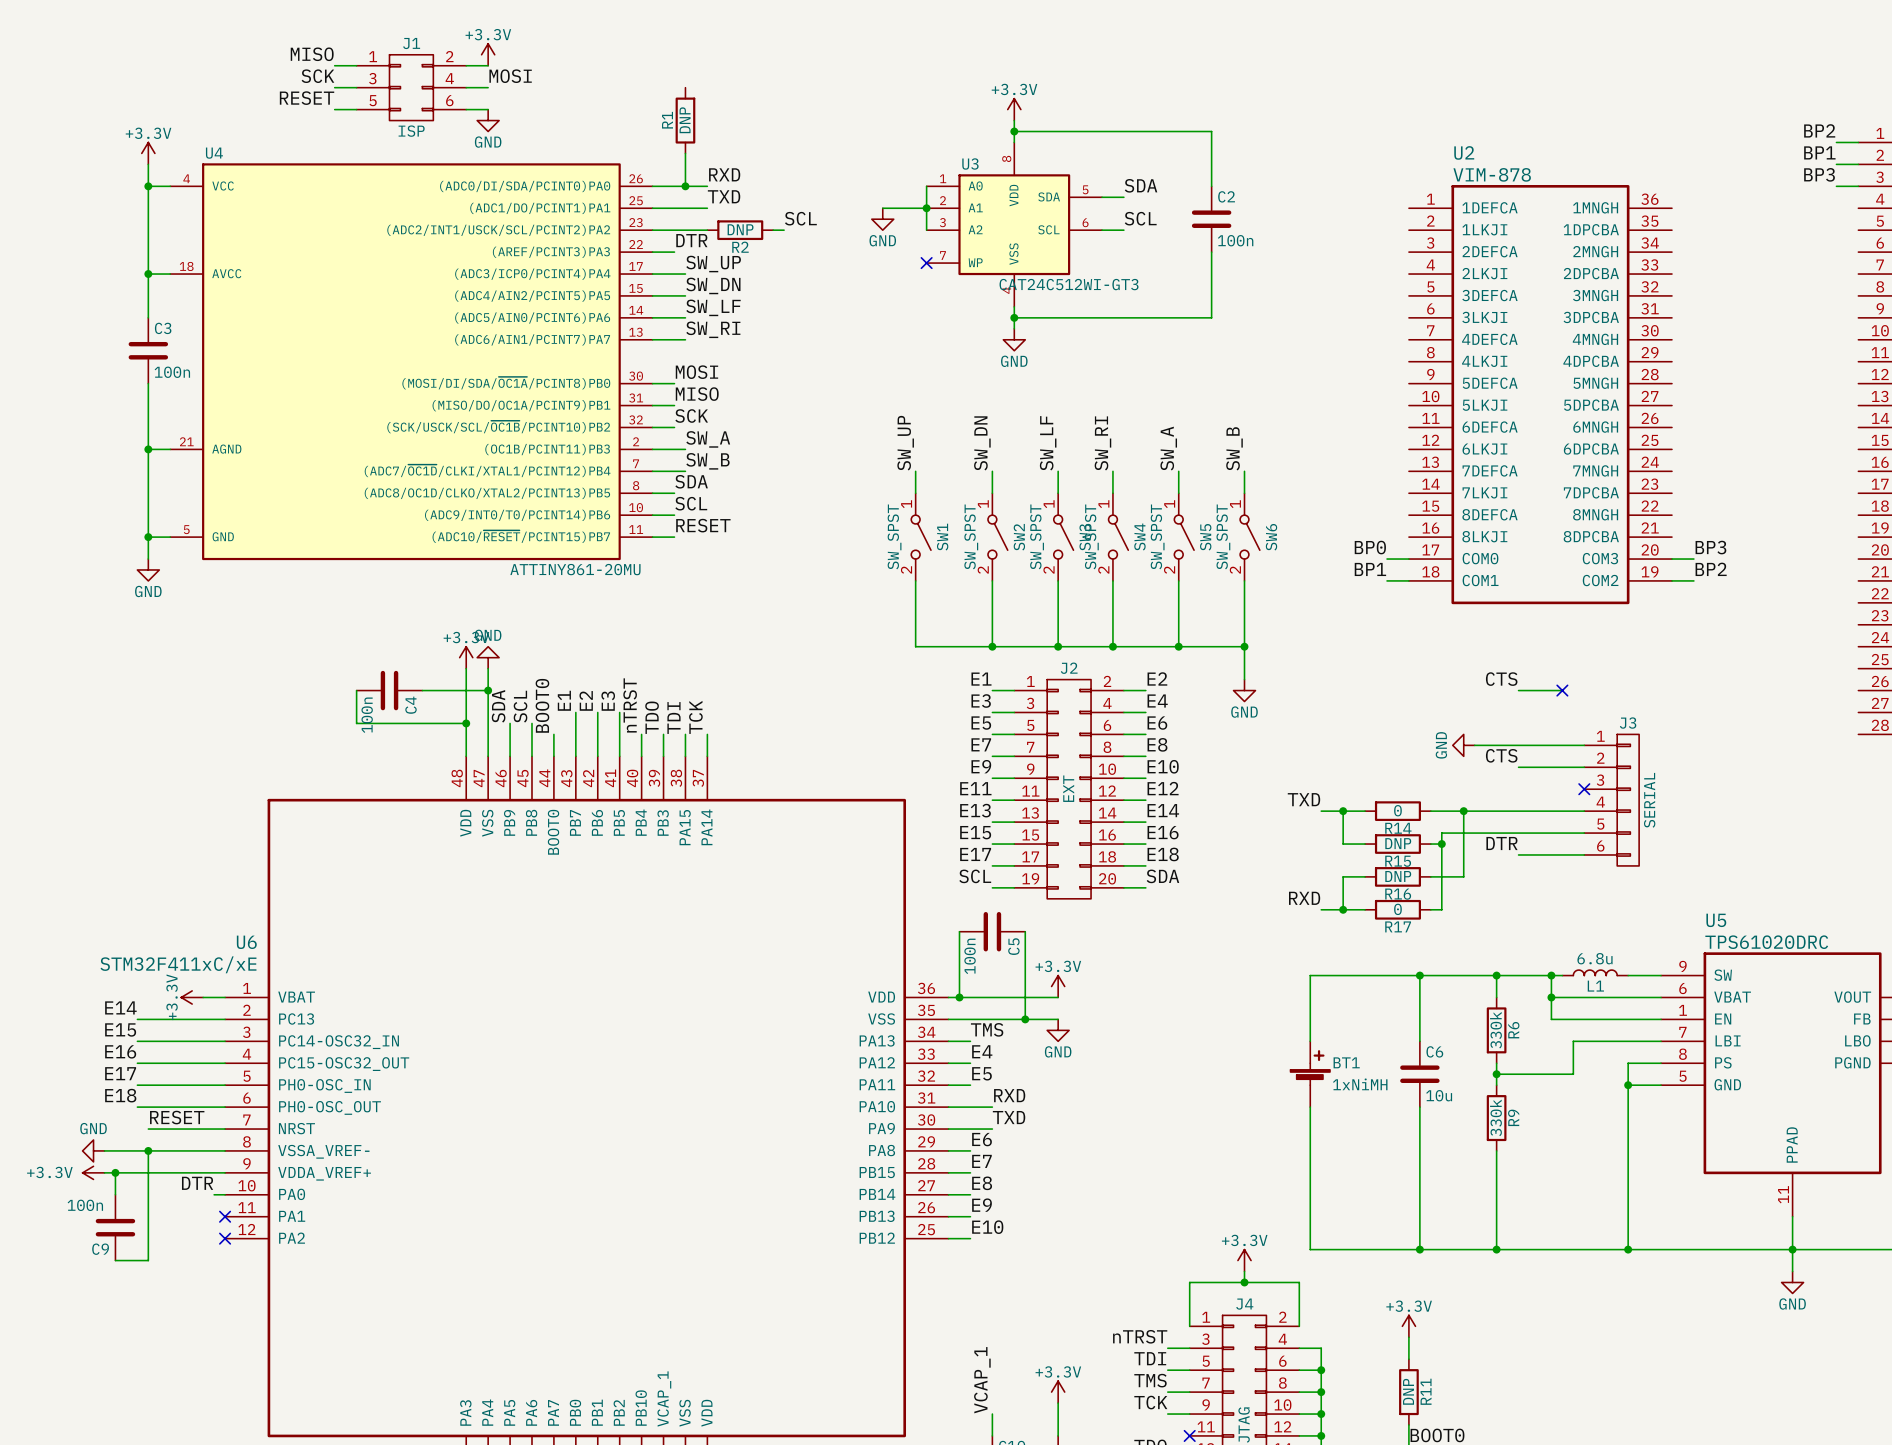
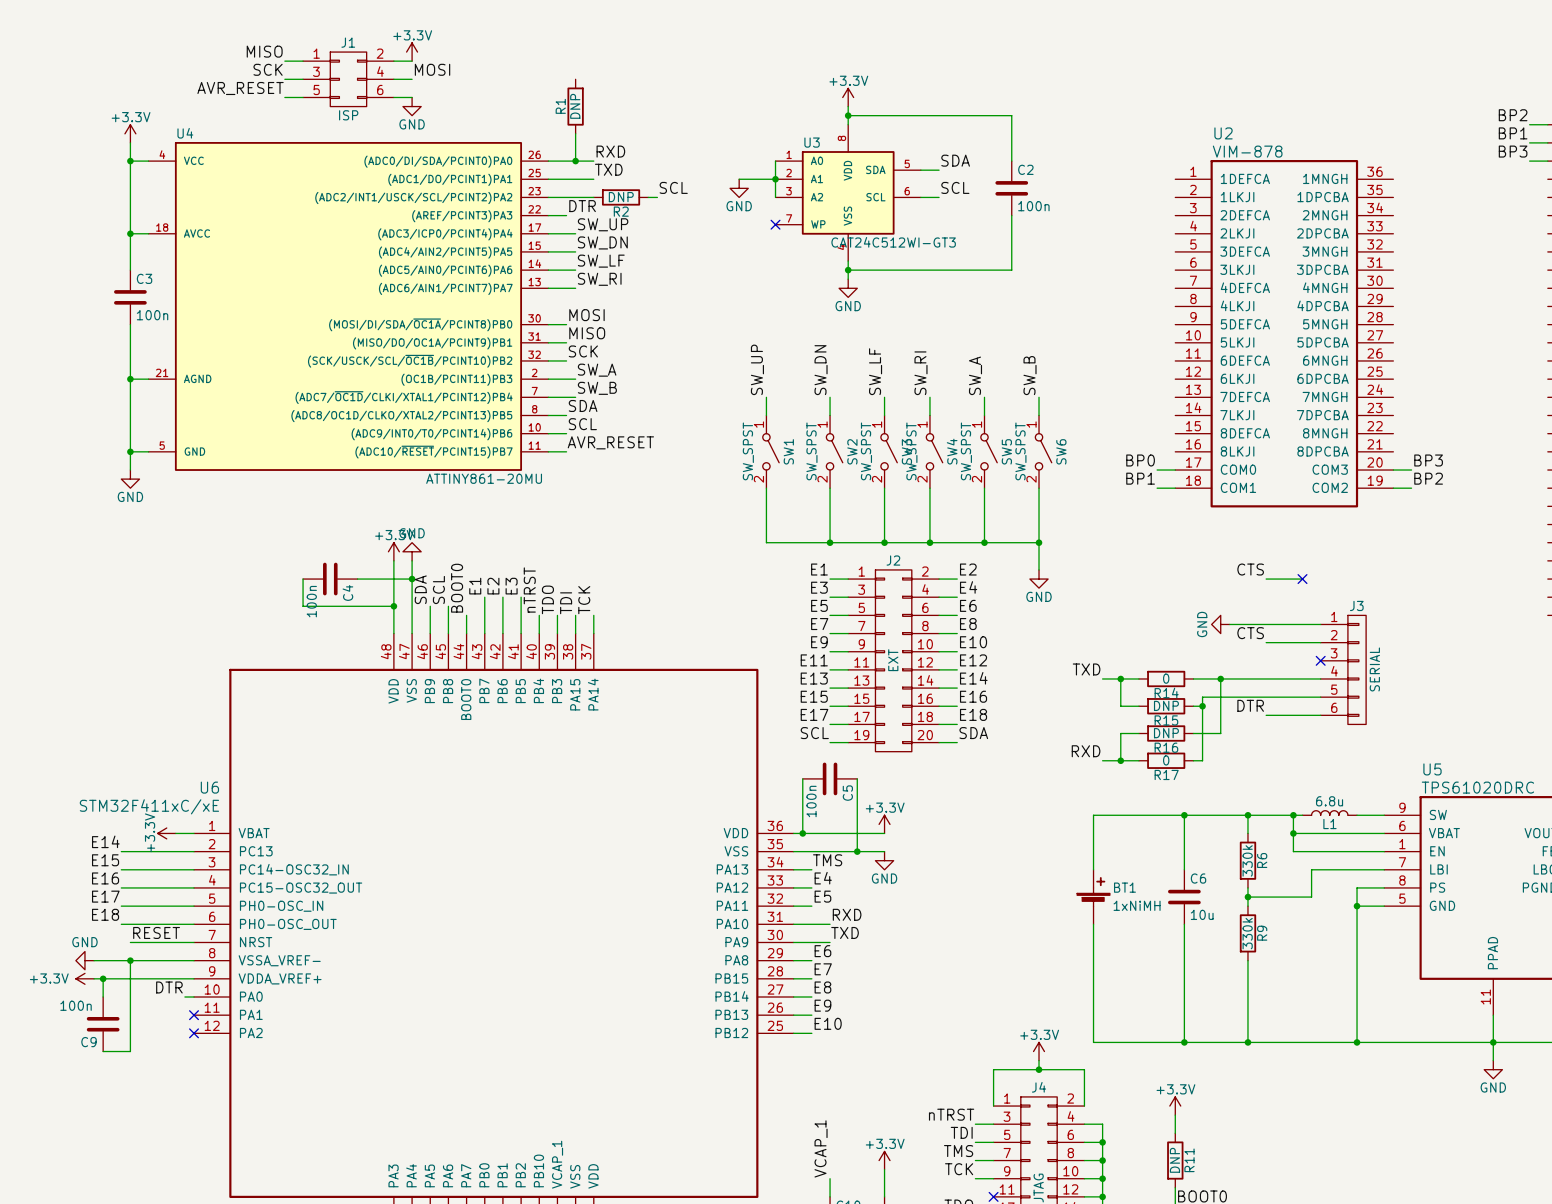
label: RESET (307, 98) -> AVR_RESET (240, 88)
label: RESET (703, 525) -> AVR_RESET (610, 442)

